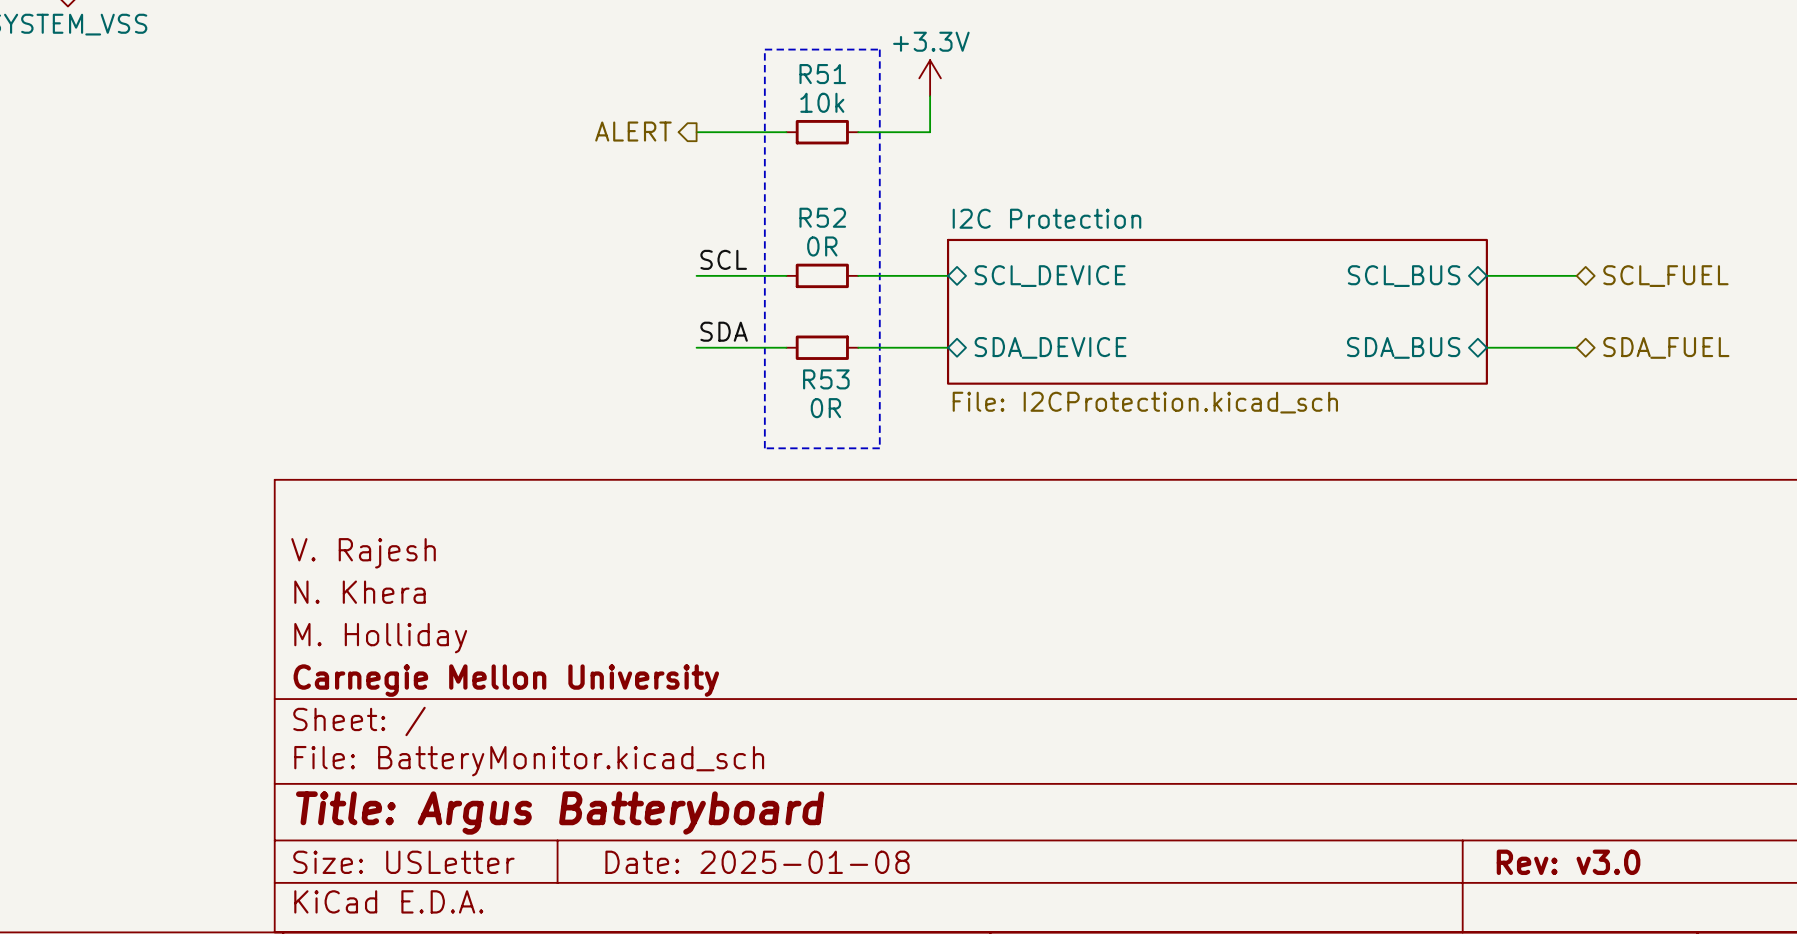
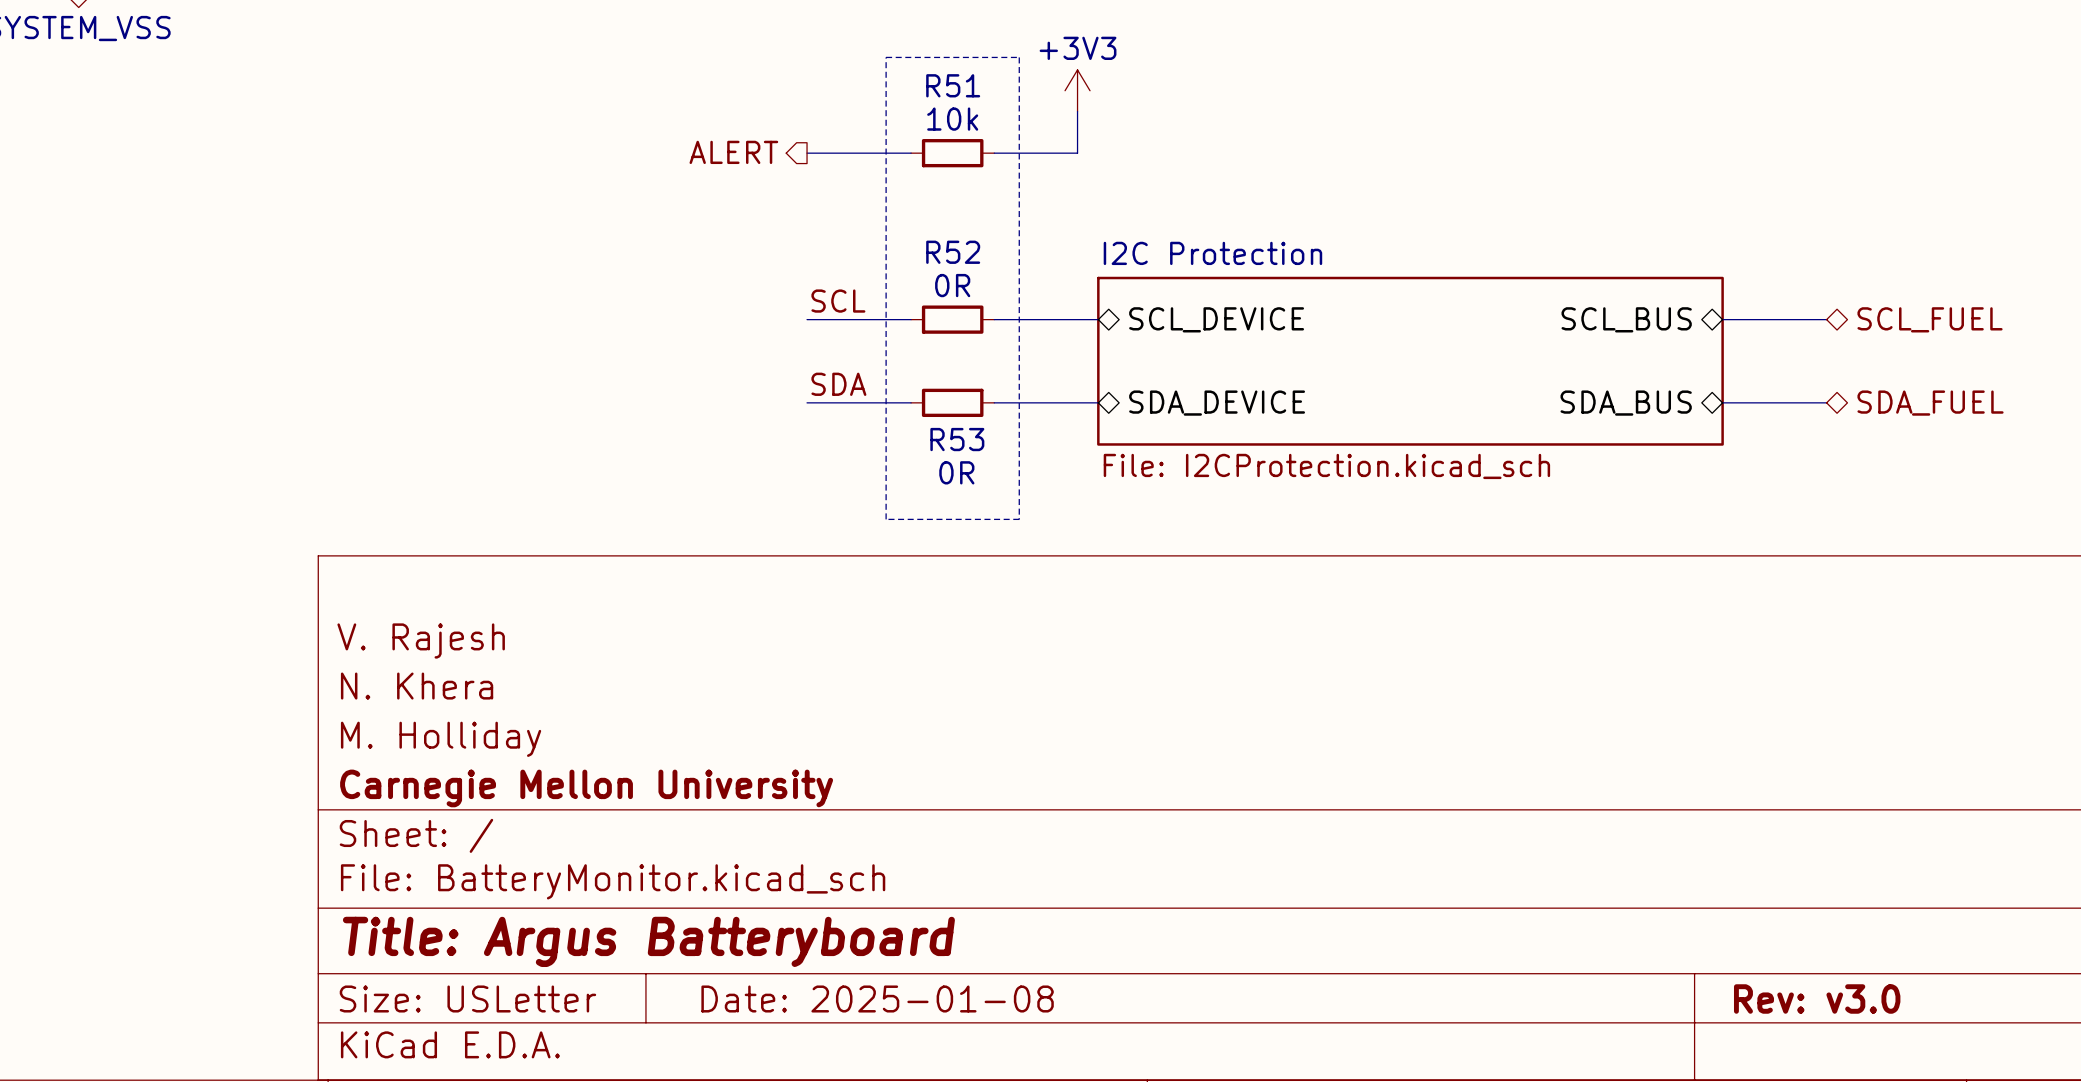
power symbol: +3.3V (930, 78) -> +3V3 (1077, 90)

